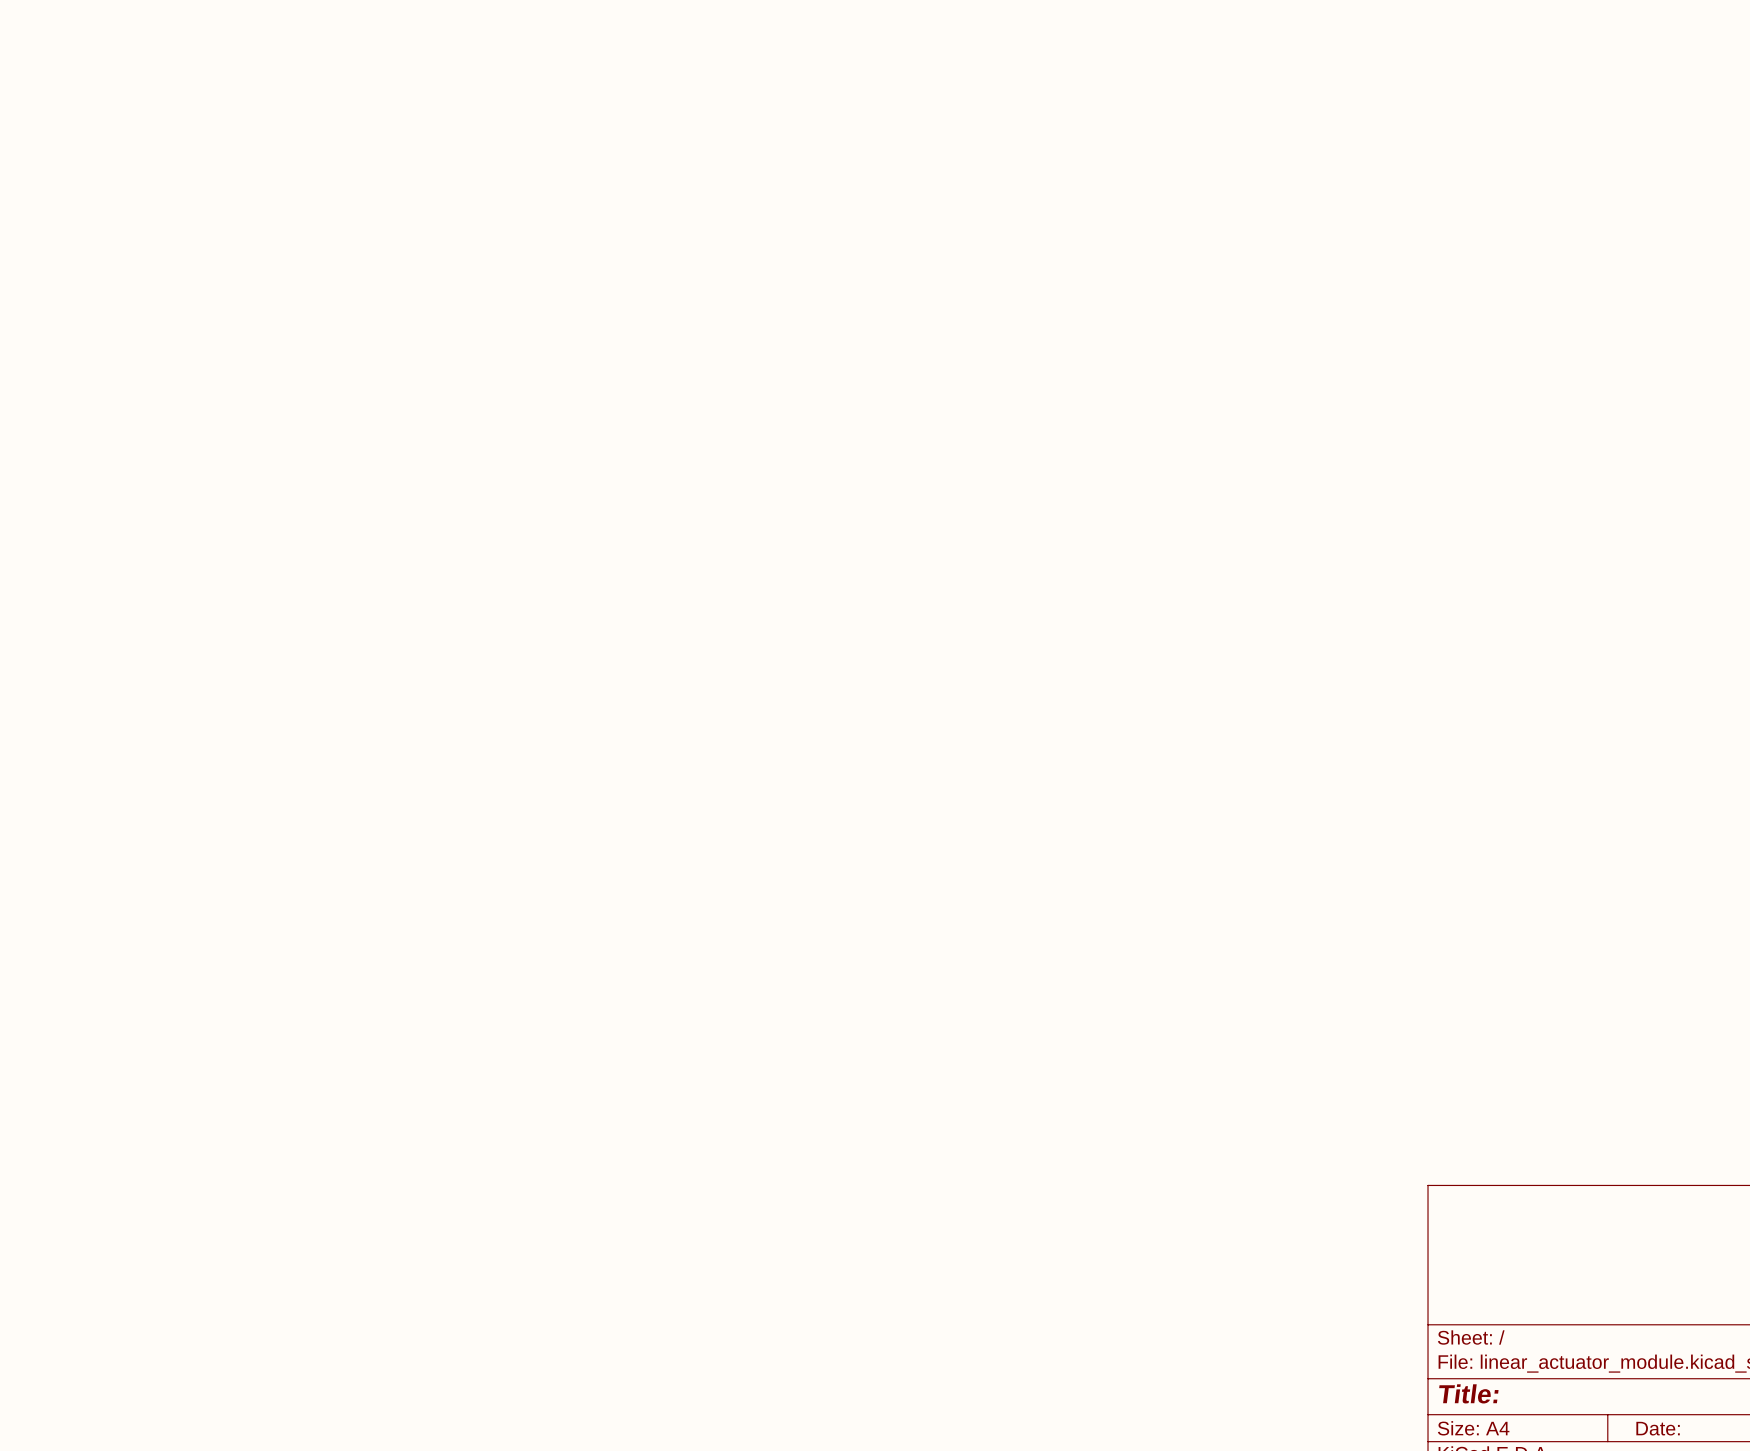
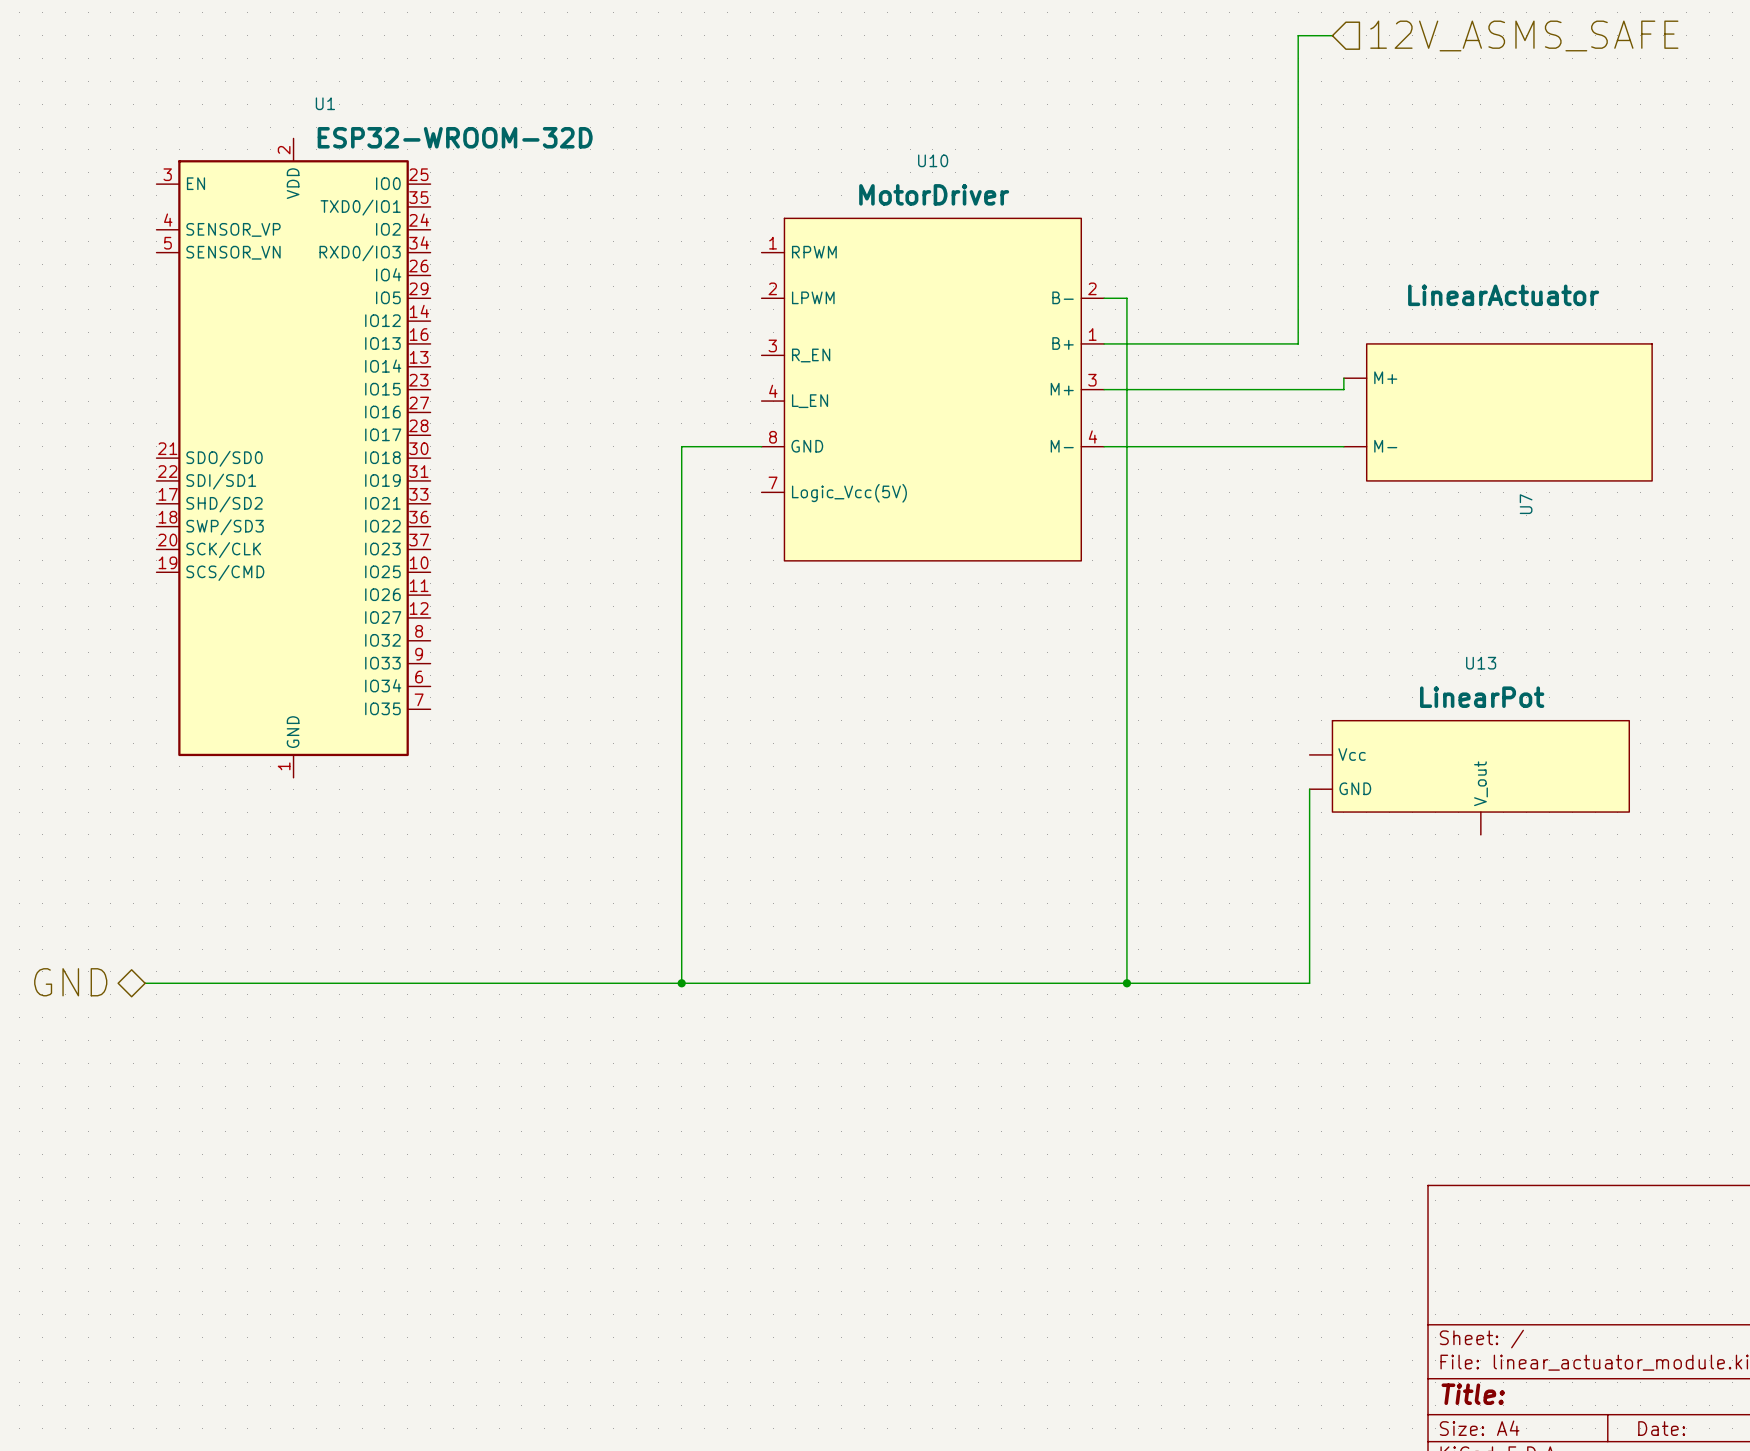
wire: none -> (1332, 35) (1298, 35) (1298, 343) (1104, 343)
hierarchical label: none -> 12V_ASMS_SAFE (1524, 35)
wire: none -> (1104, 298) (1126, 298) (1126, 983)
wire: none -> (1343, 378) (1343, 389) (1104, 389)
U10: none -> MotorDriver (932, 389)
U7: none -> LinearActuator (1497, 412)
wire: none -> (761, 446) (681, 446) (681, 983)
wire: none -> (1104, 446) (1343, 446)
U1: none -> ESP32-WROOM-32D (293, 458)
U13: none -> LinearPot (1469, 777)
wire: none -> (1309, 789) (1309, 983) (145, 983)
hierarchical label: none -> GND (70, 982)
junction: none -> (681, 983)
junction: none -> (1126, 983)

